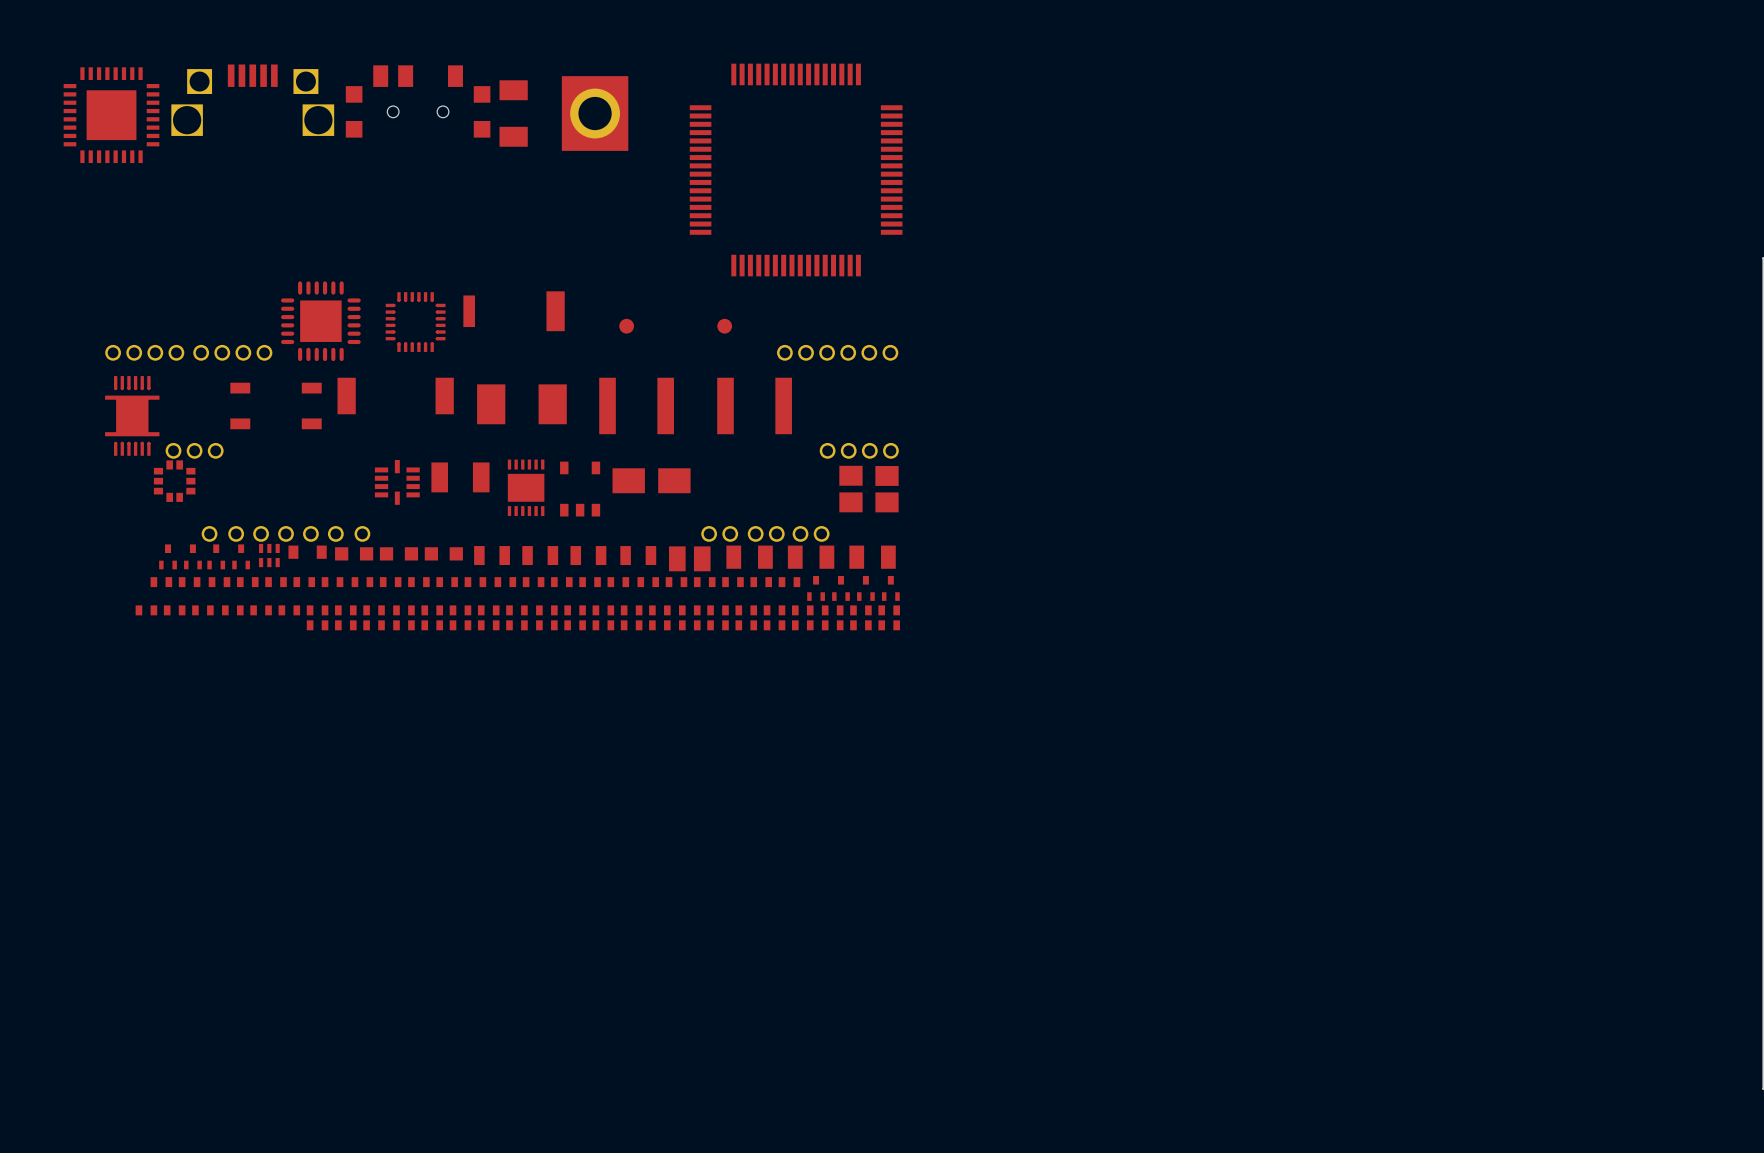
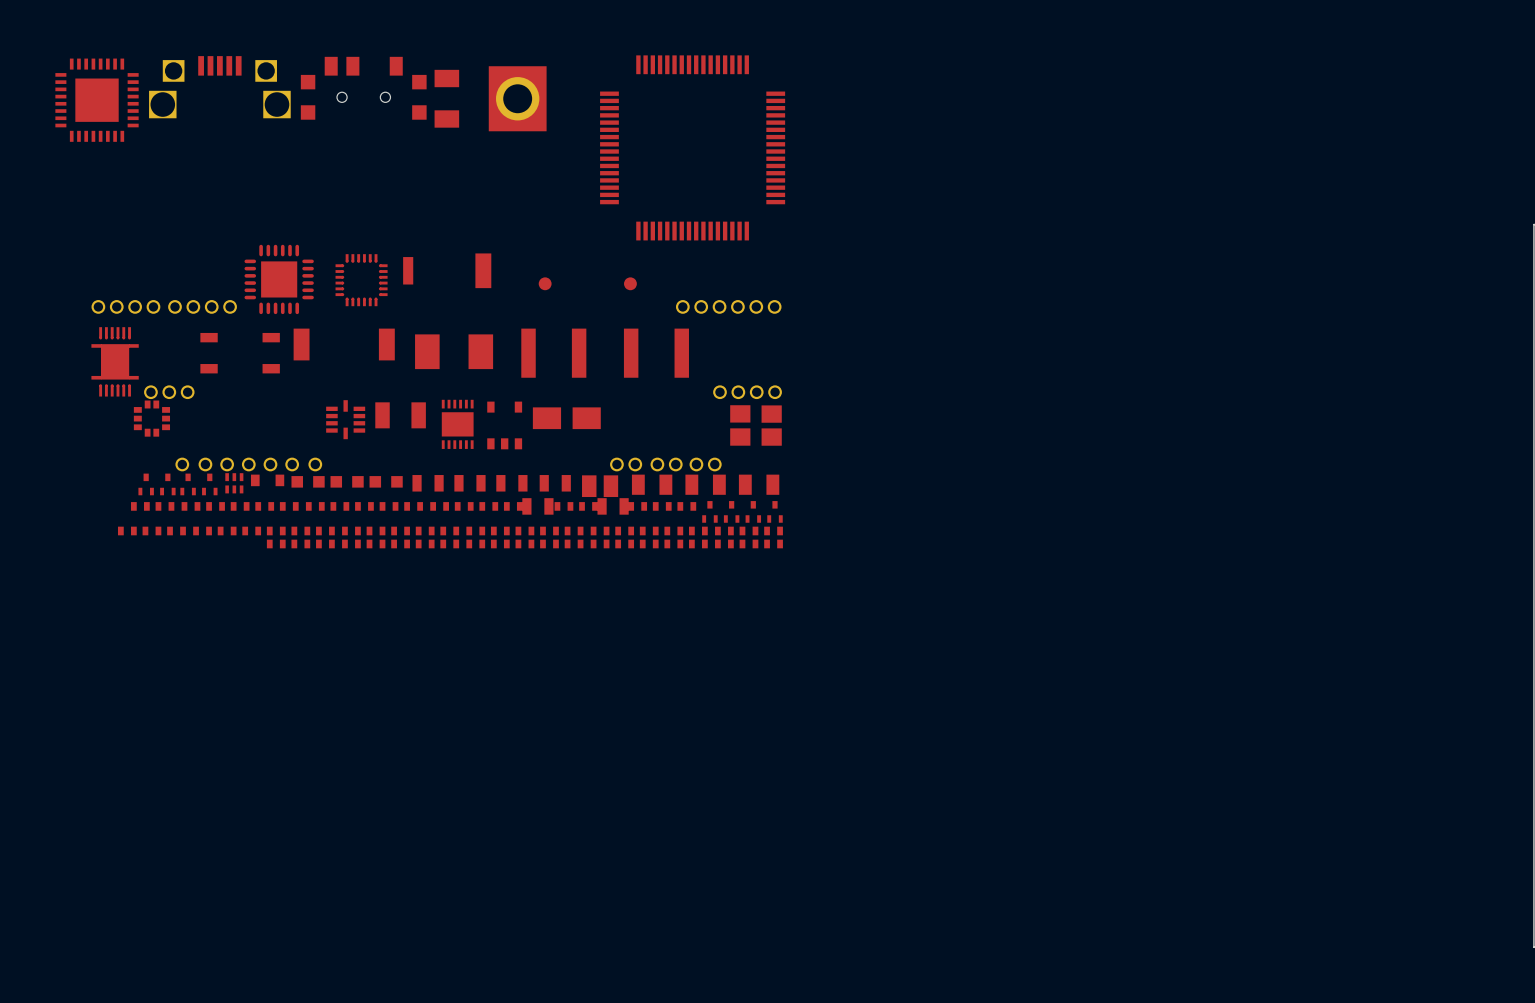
part footprint: [607, 577, 630, 588] -> [522, 498, 554, 515]
part footprint: [693, 577, 716, 588] -> [597, 498, 629, 515]

